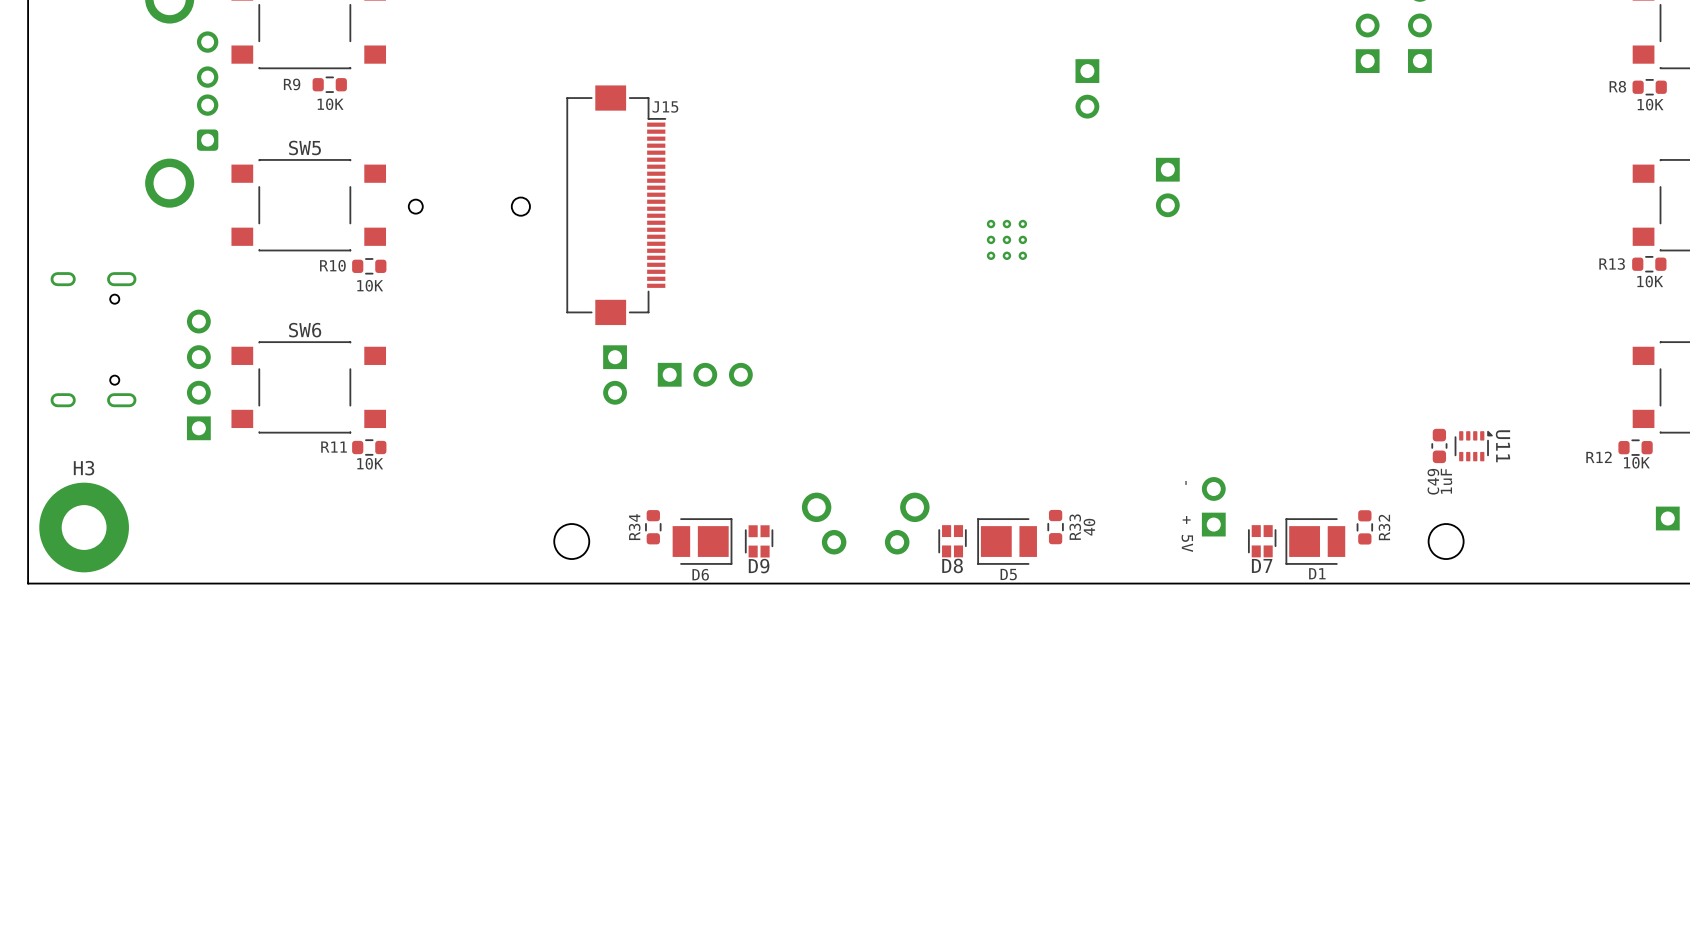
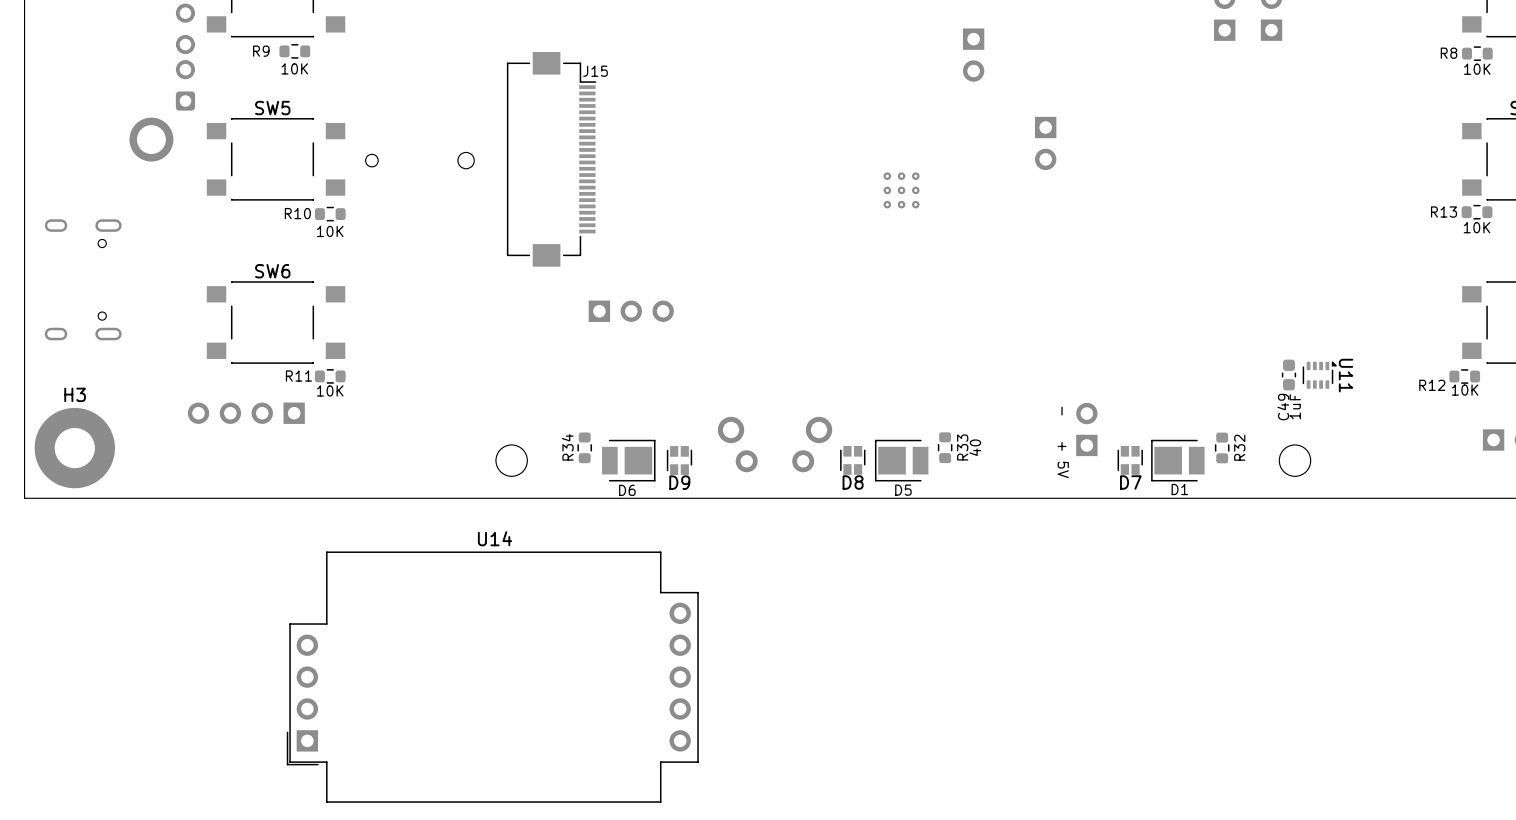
part rotation: 0° (198, 374) -> 90° counterclockwise (246, 413)
part position: (198, 374) -> (246, 413)
part: (615, 374) -> none
U14: none -> (492, 677)

